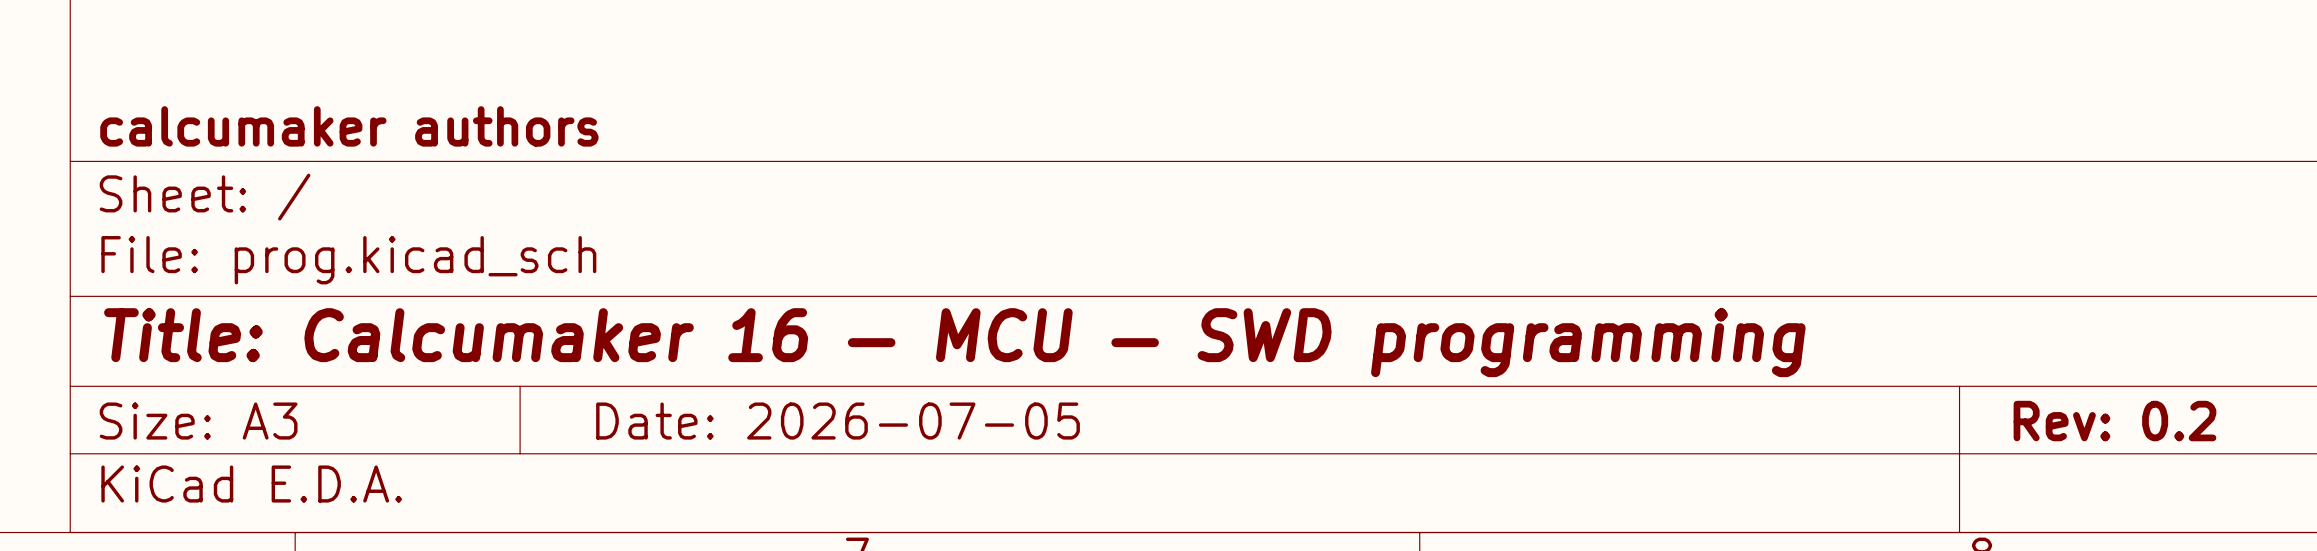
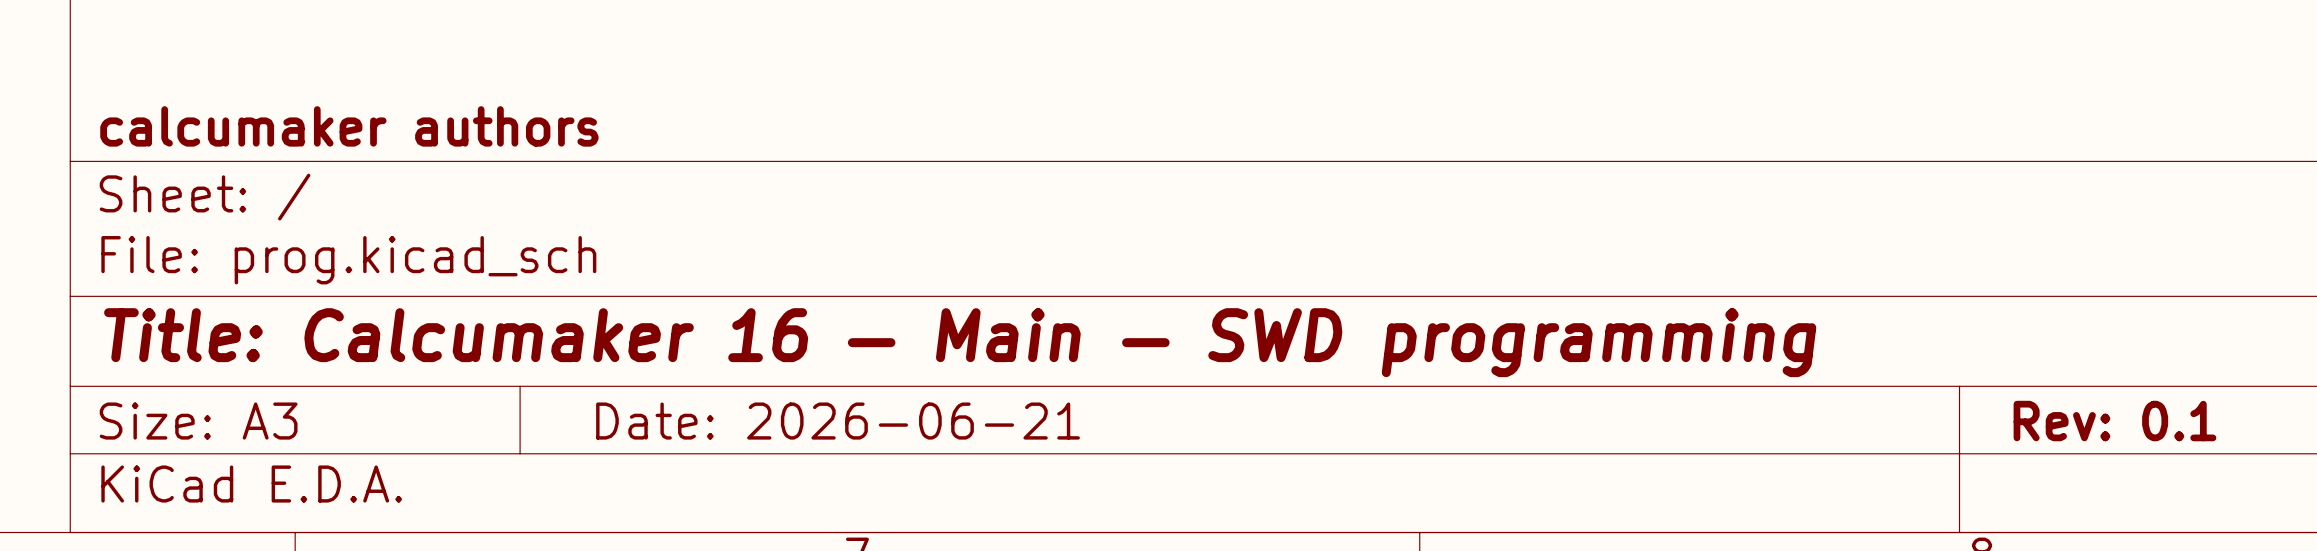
title block: Title: Calcumaker 16 — MCU — SWD programming (954, 342) -> Title: Calcumaker 16 — Main — SWD programming (960, 342)
title block: Date: 2026-07-05 (838, 421) -> Date: 2026-06-21 (838, 421)
title block: Rev: 0.2 (2114, 421) -> Rev: 0.1 (2114, 421)

